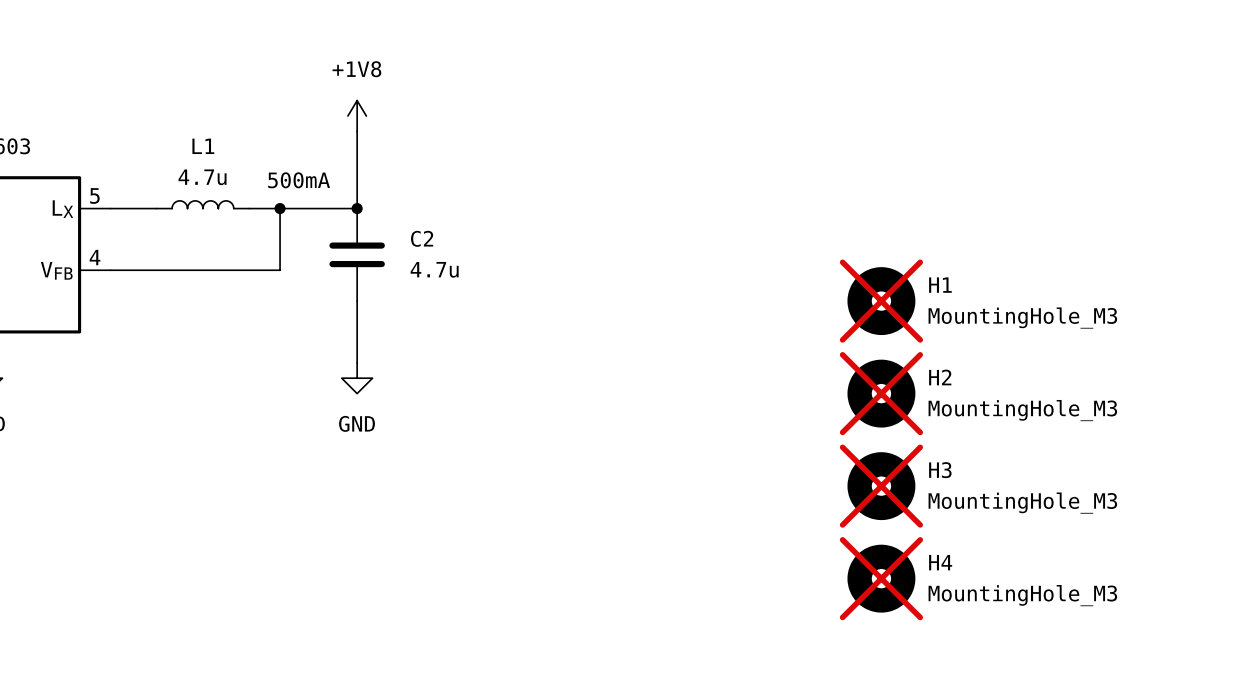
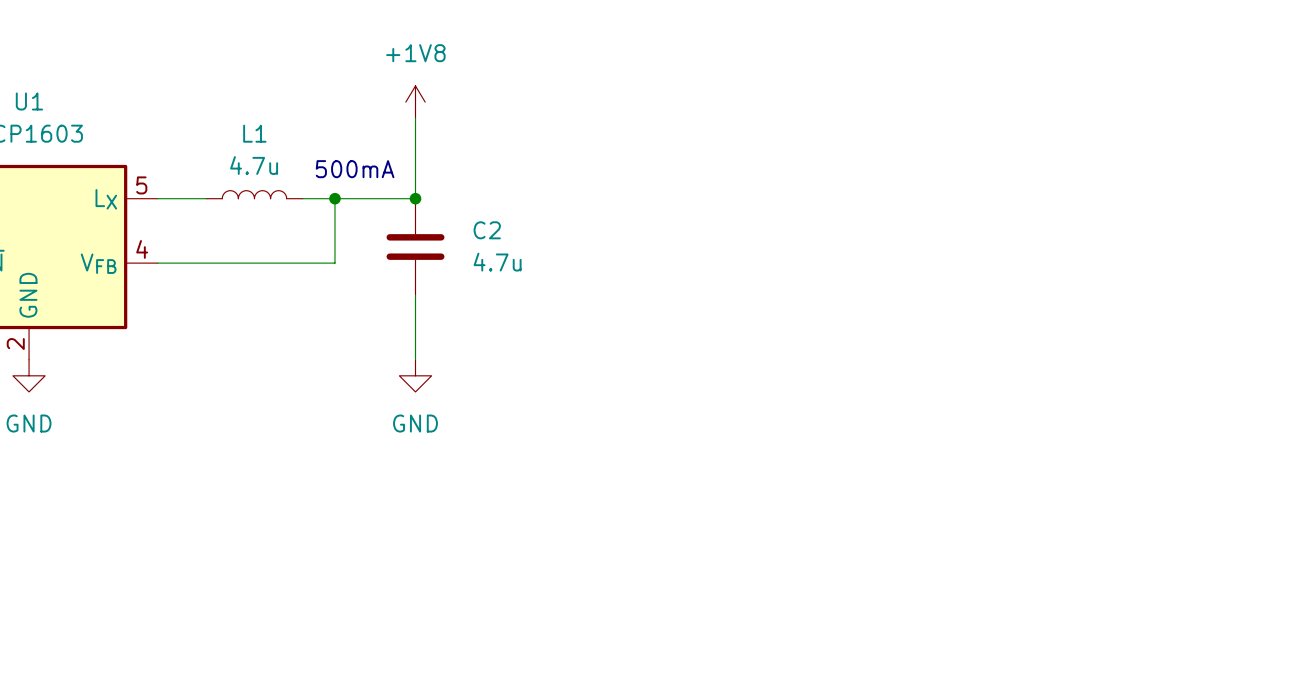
H1: MountingHole_M3 (881, 301) -> none
H2: MountingHole_M3 (881, 393) -> none
H3: MountingHole_M3 (881, 486) -> none
H4: MountingHole_M3 (881, 578) -> none

